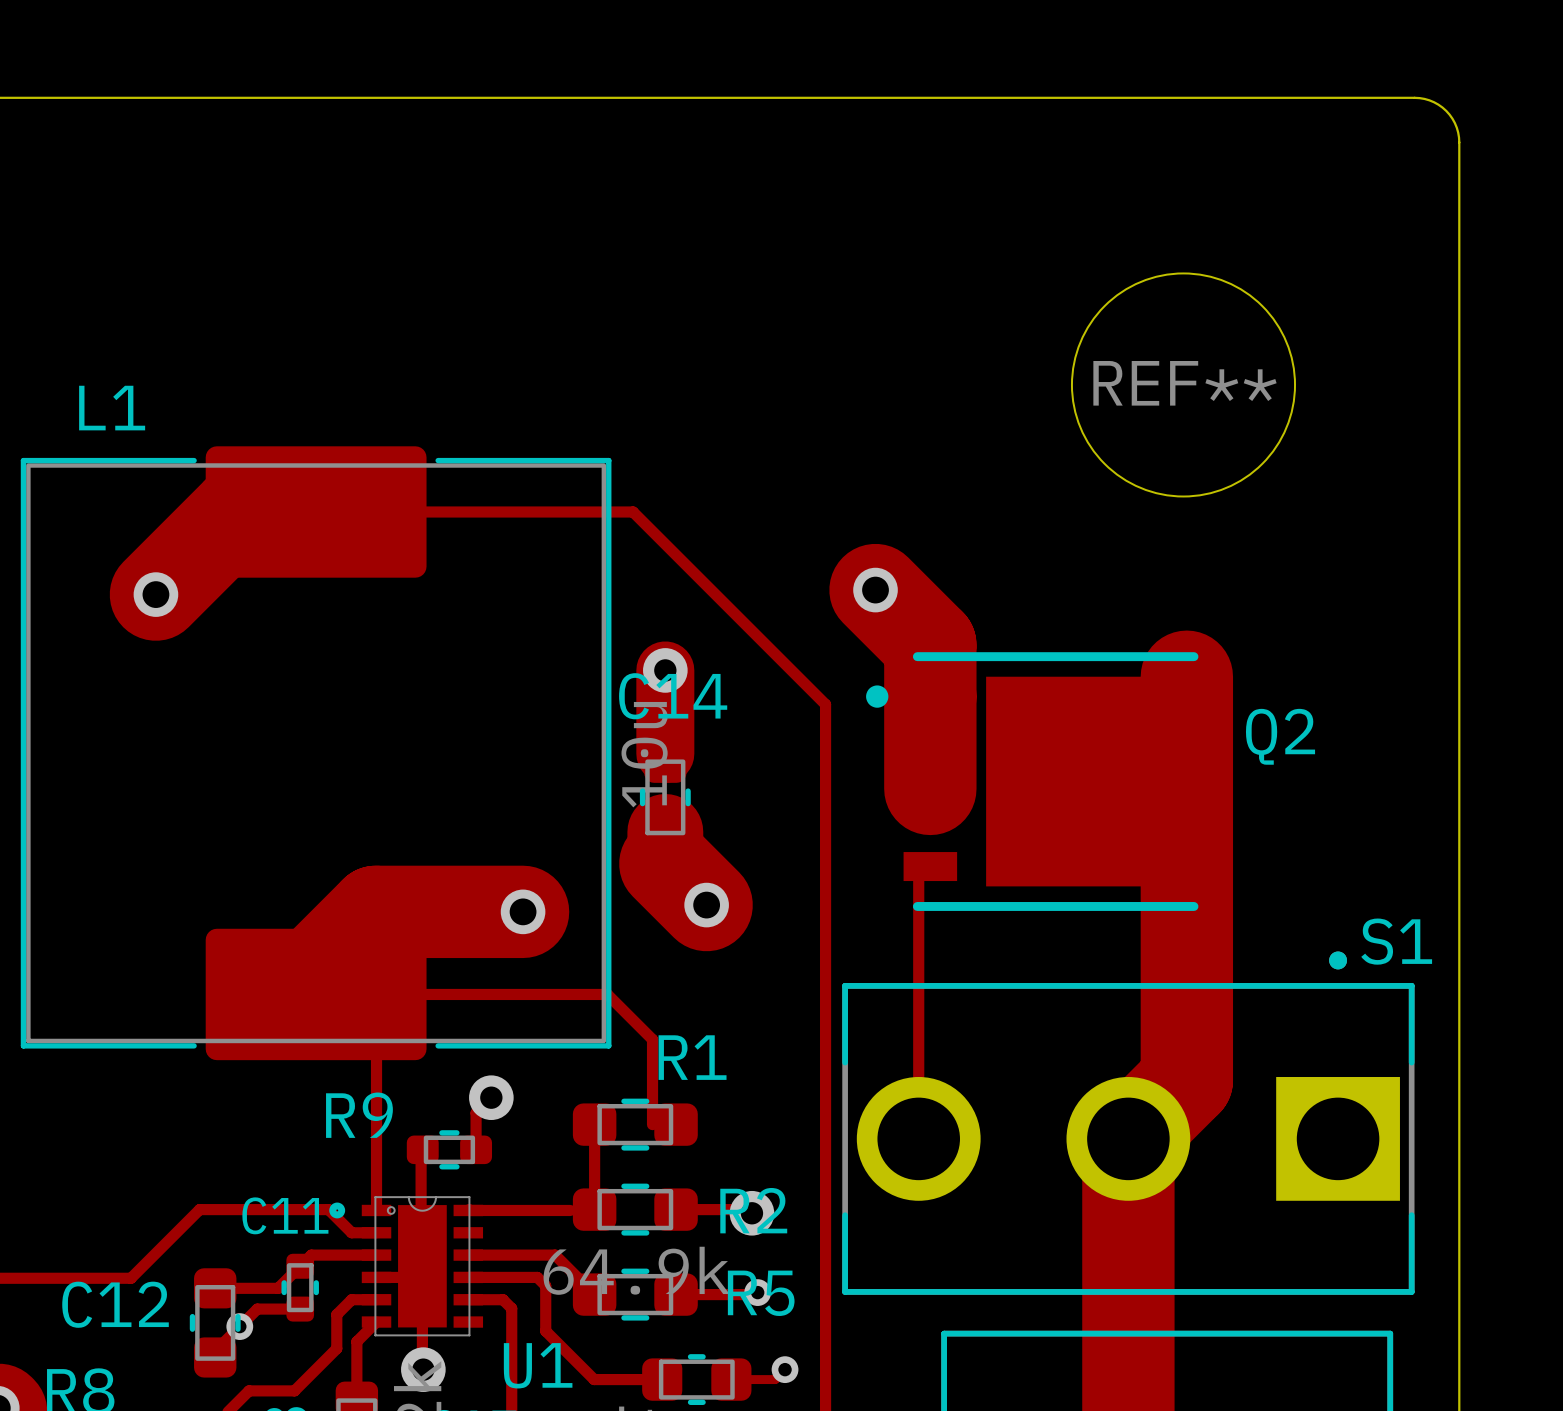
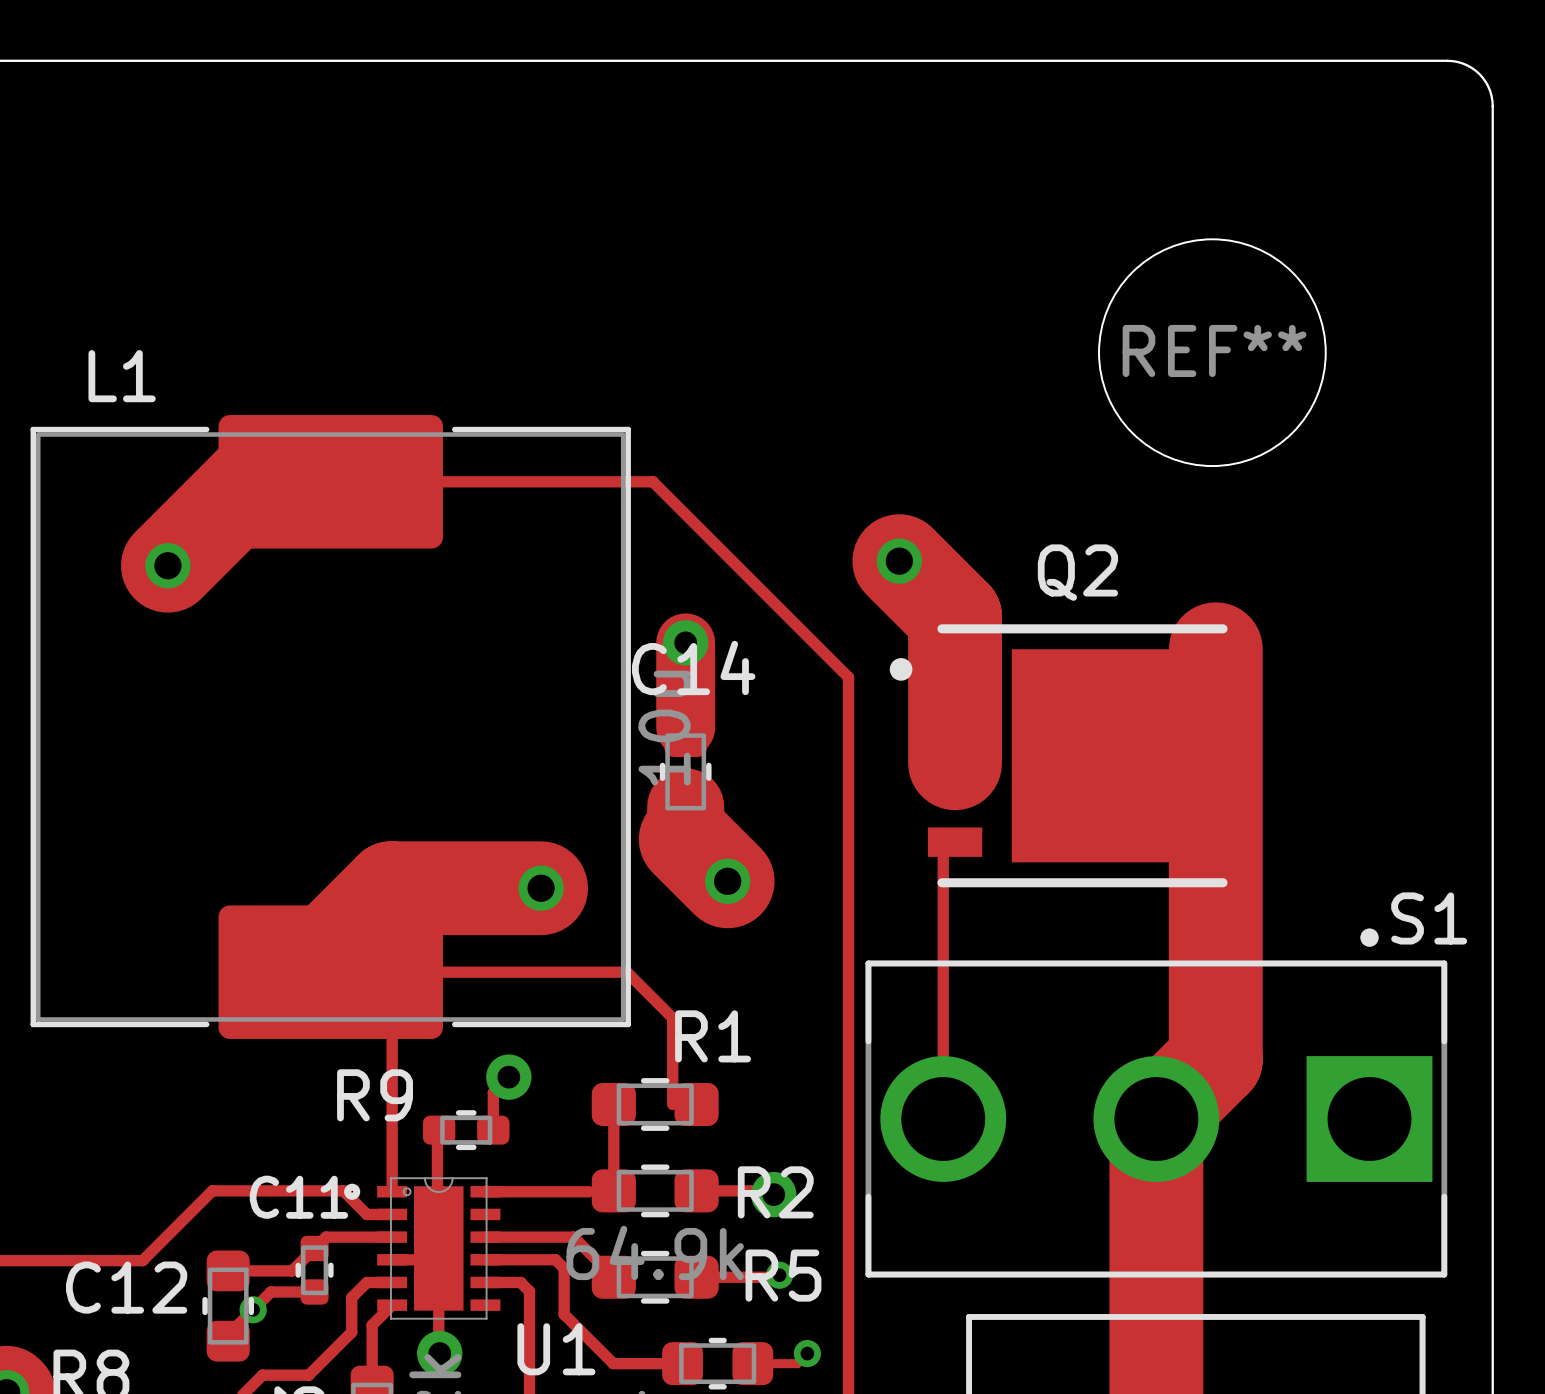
Q2 name position: Q2 (1280, 736) -> Q2 (1077, 572)

